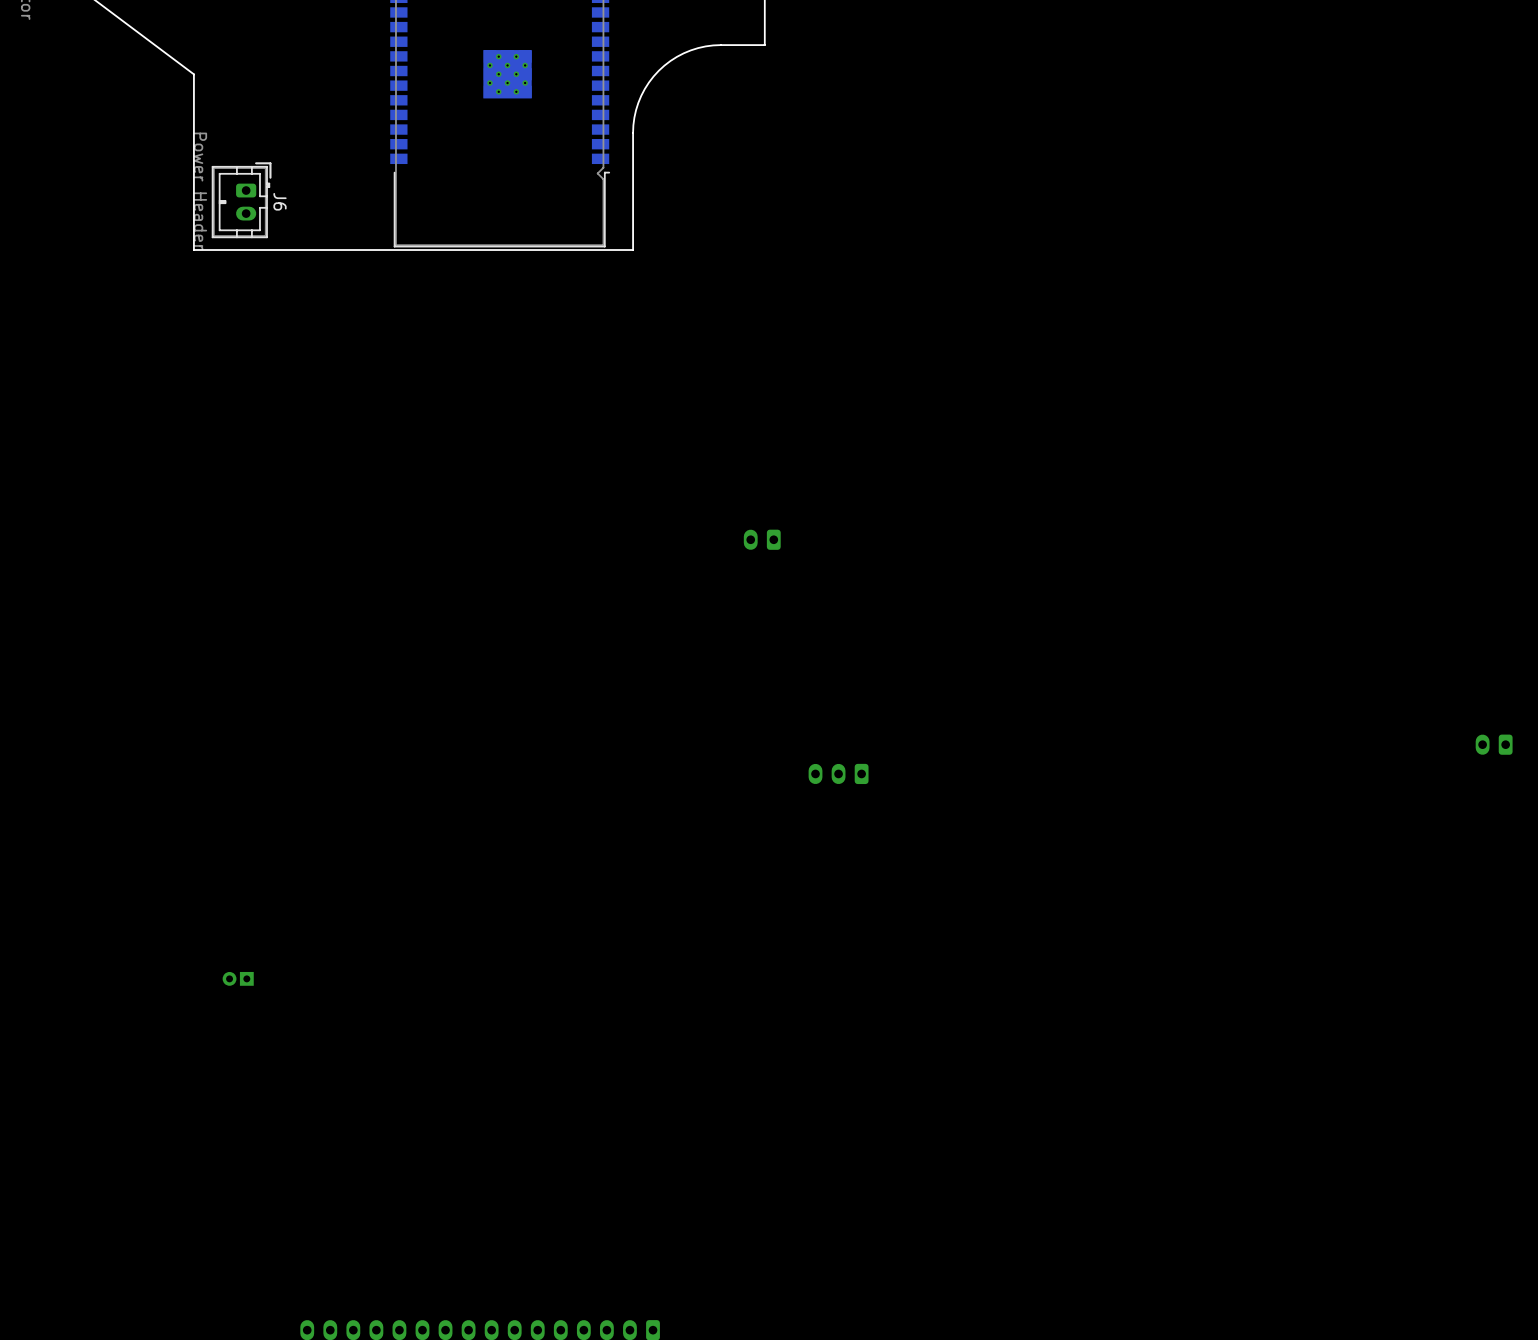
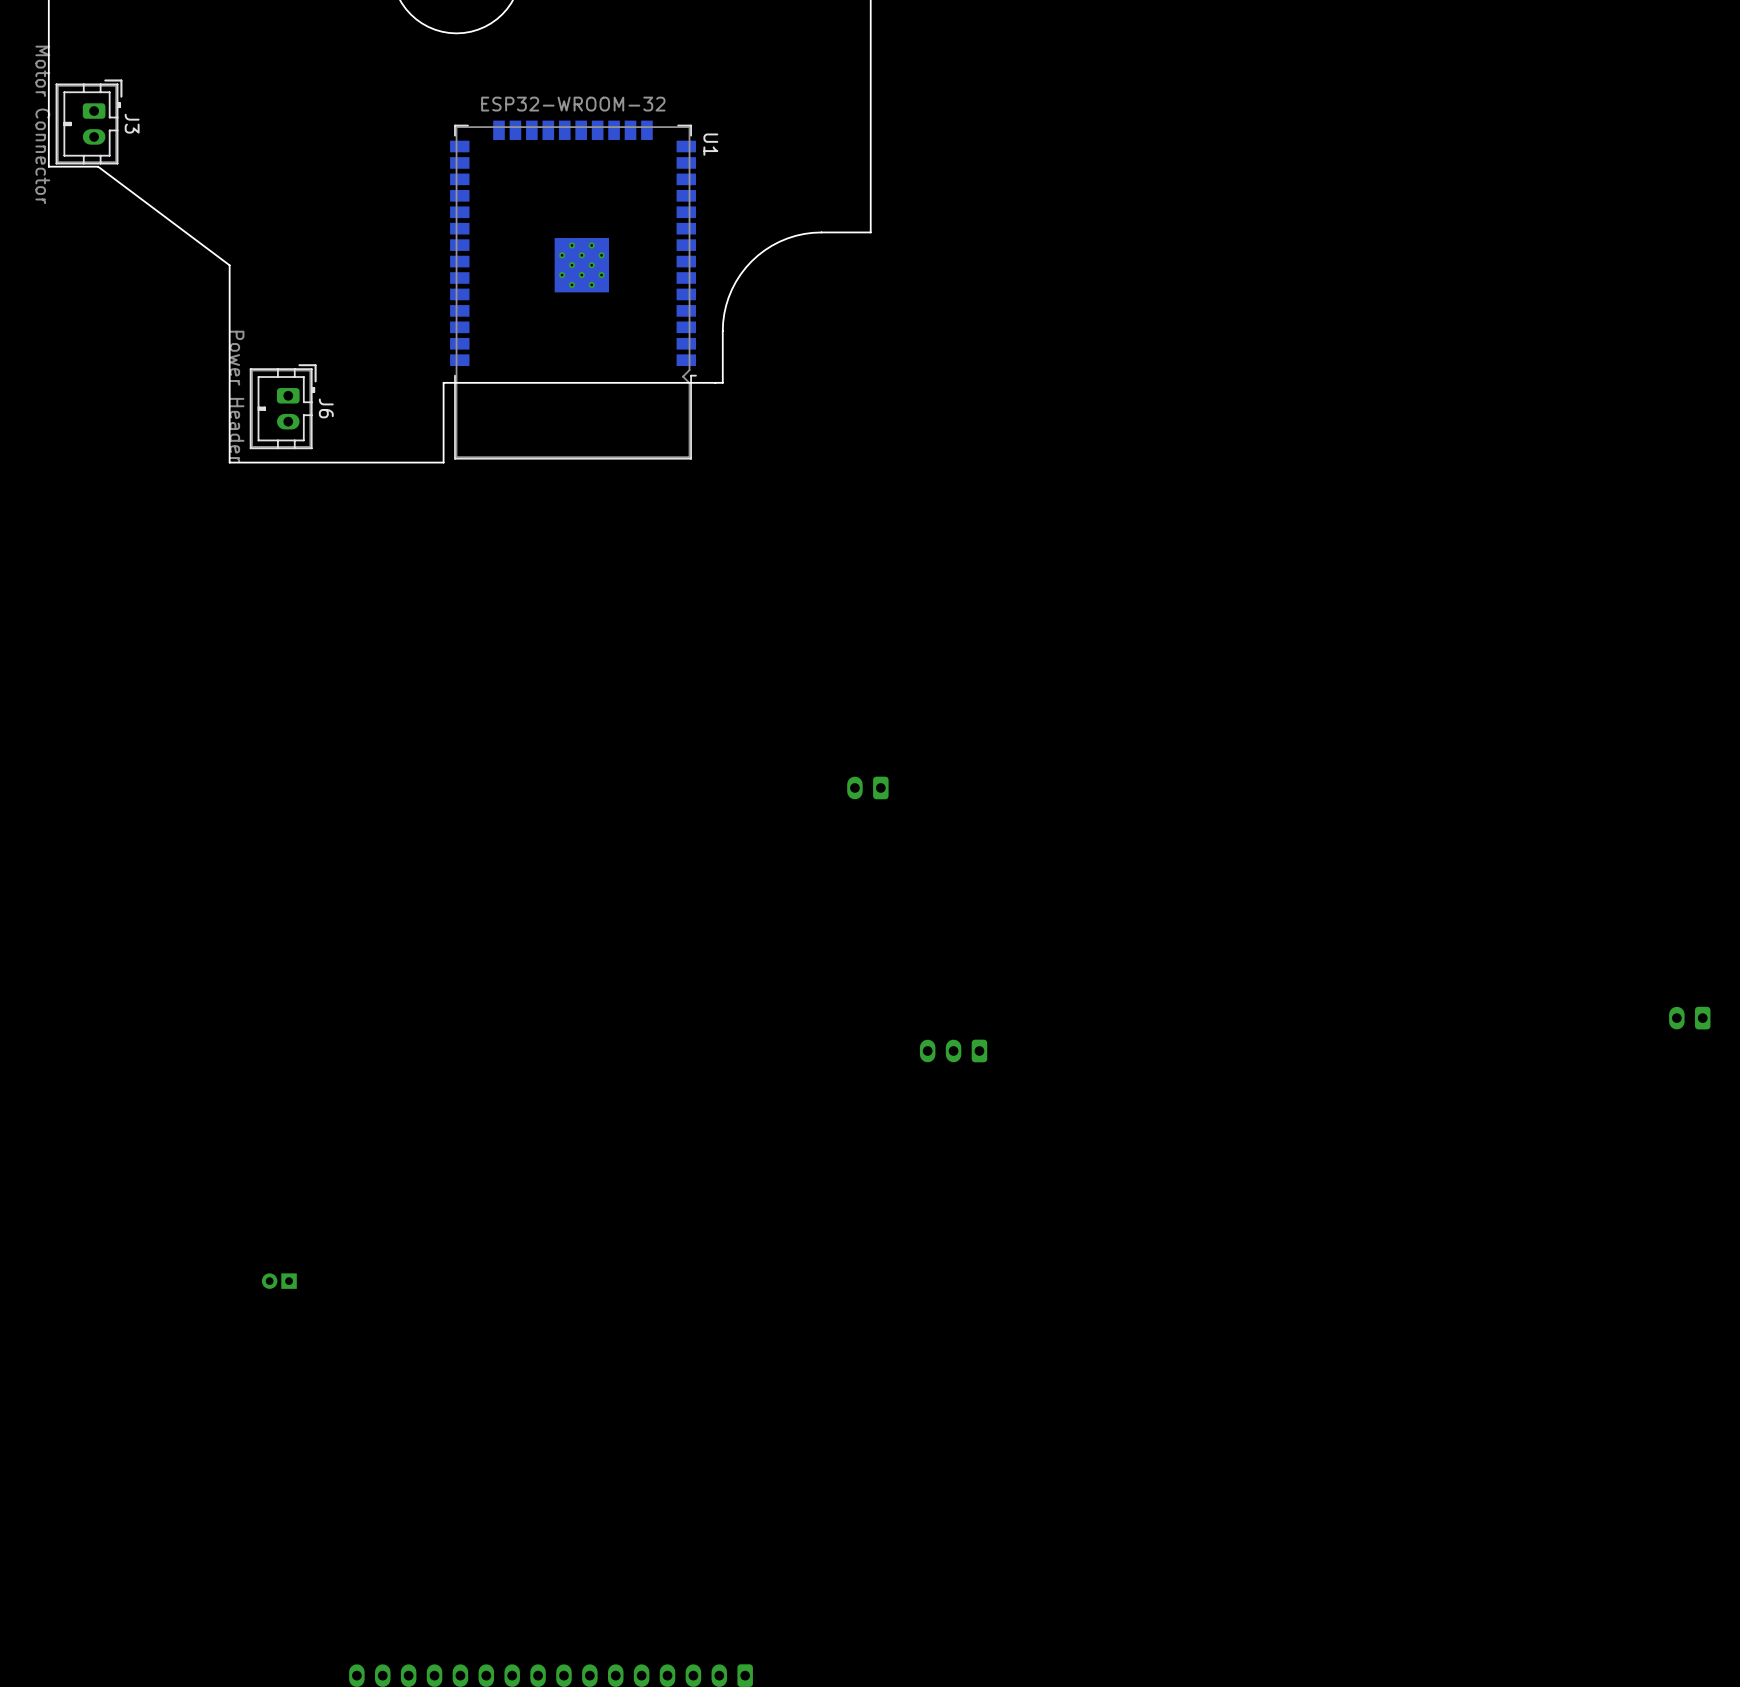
board edge: (633, 179) (633, 250) (384, 250) -> (722, 382) (443, 382) (443, 462)

